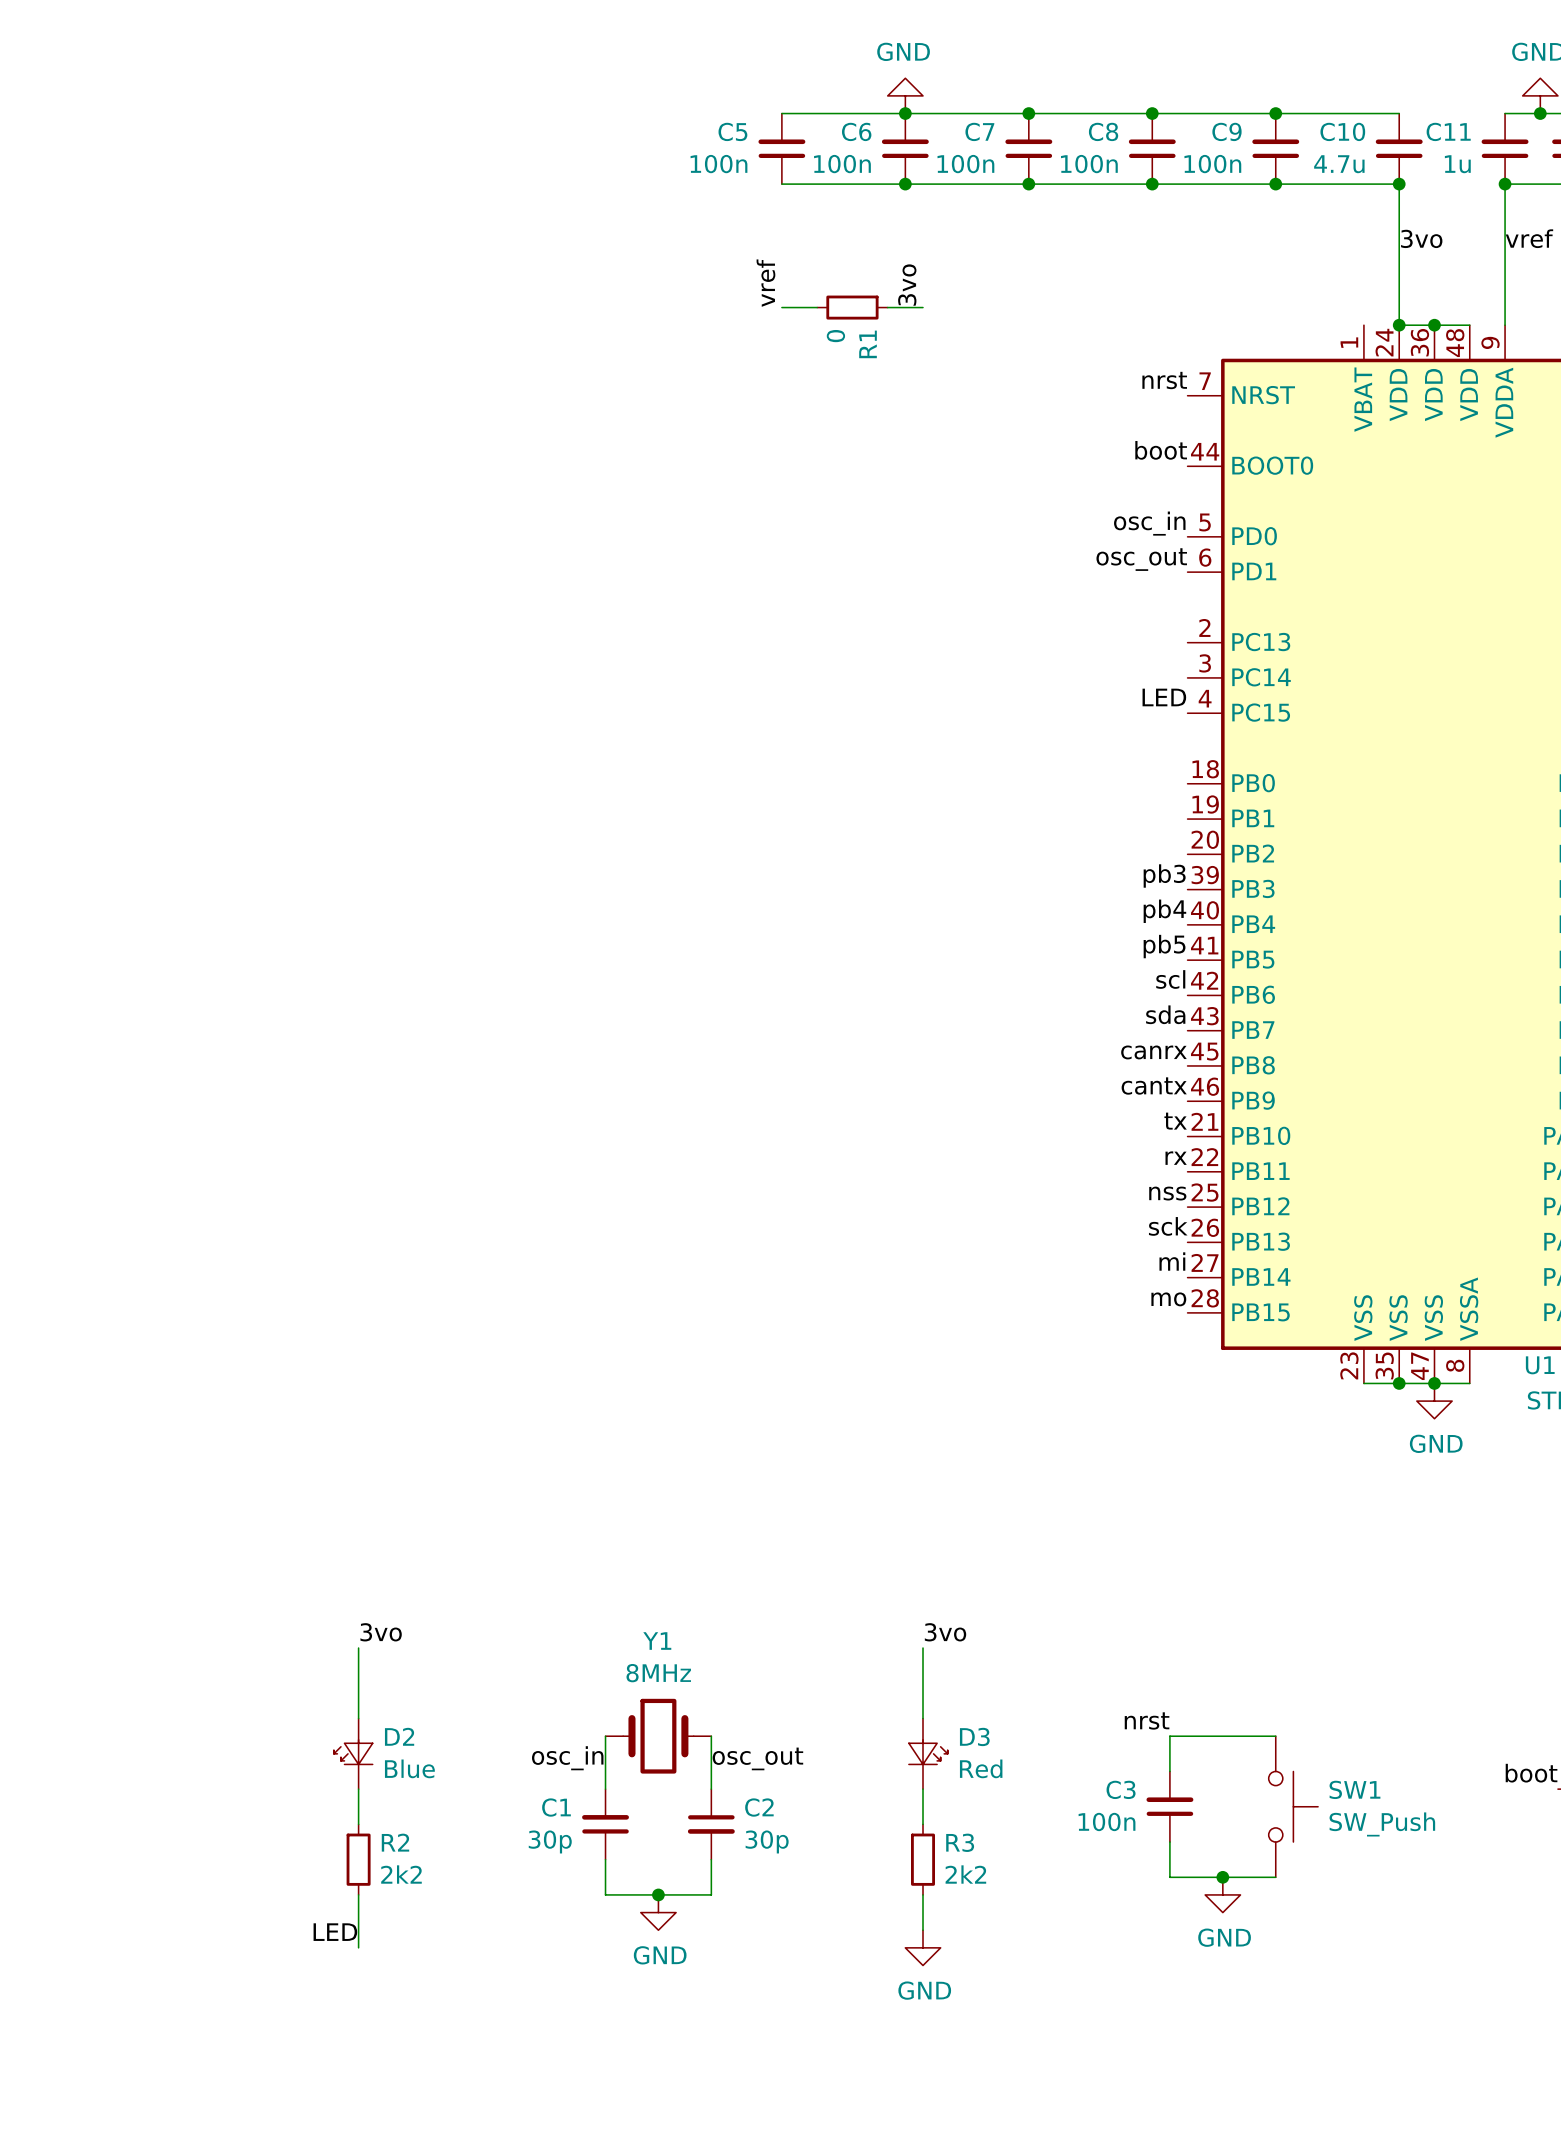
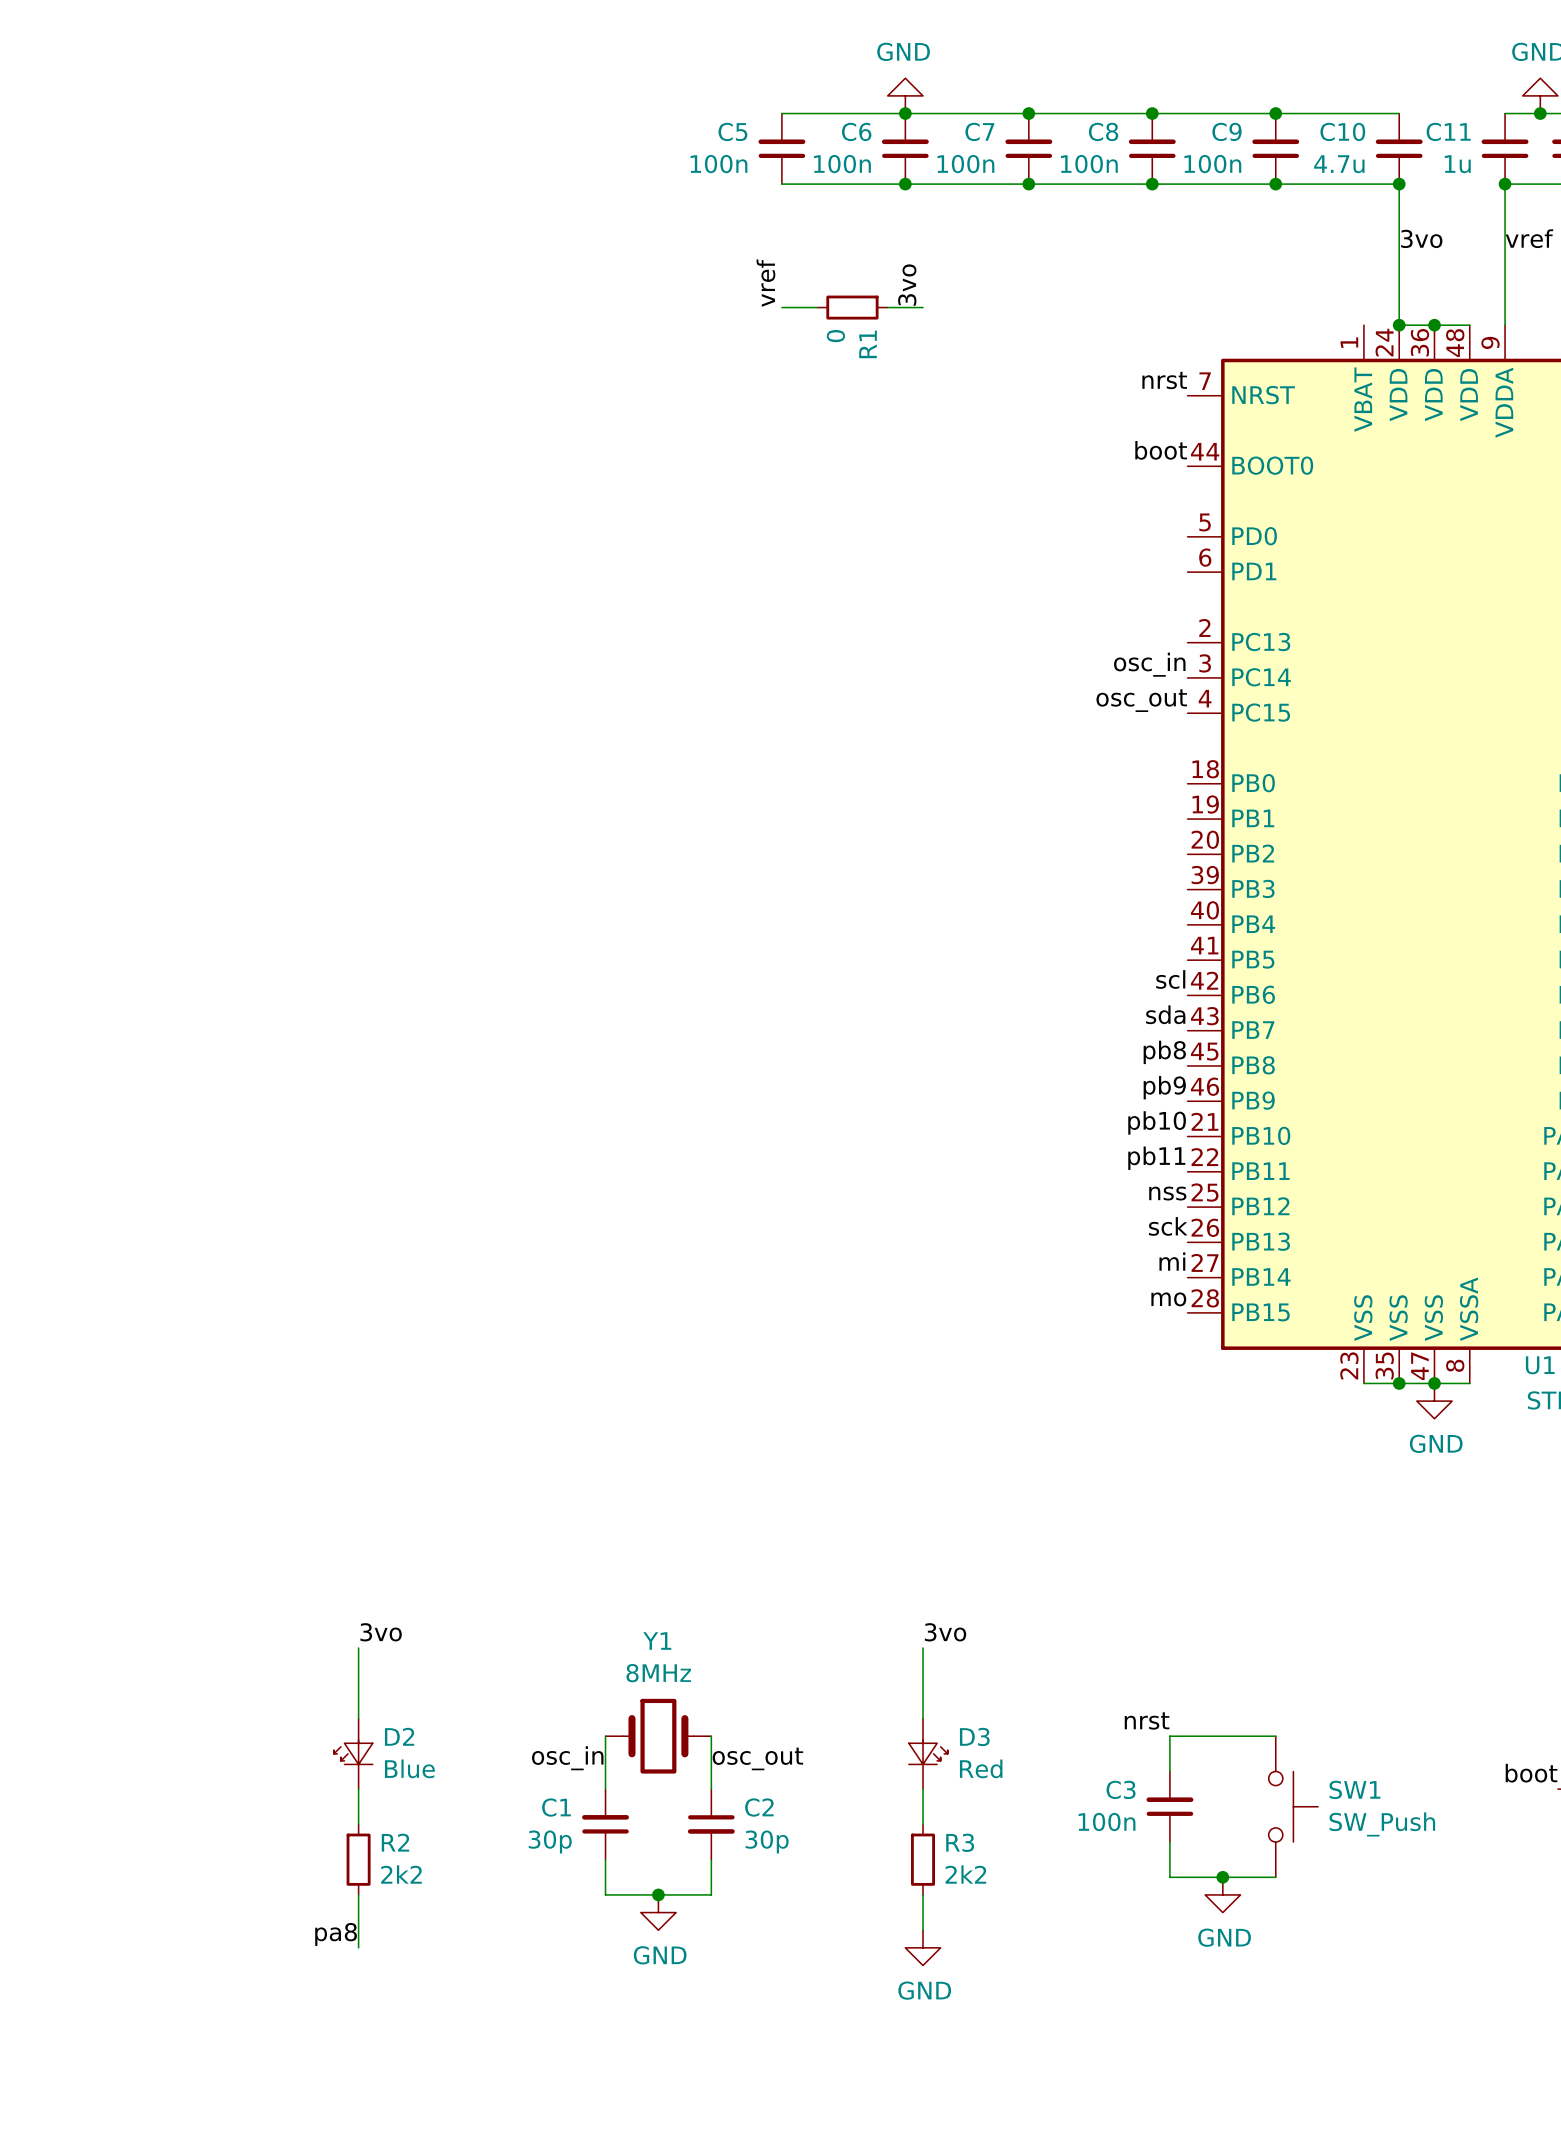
label position: osc_in (1149, 523) -> osc_in (1149, 664)
label: osc_out (1141, 559) -> none
label: LED (1164, 697) -> osc_out (1141, 700)
label: pb3 (1164, 876) -> none
label: pb4 (1164, 911) -> none
label: pb5 (1164, 946) -> none
label: canrx (1153, 1052) -> pb8 (1164, 1052)
label: cantx (1154, 1086) -> pb9 (1164, 1087)
label: tx (1175, 1121) -> pb10 (1157, 1122)
label: rx (1176, 1158) -> pb11 (1156, 1158)
label: LED (335, 1932) -> pa8 (336, 1934)

